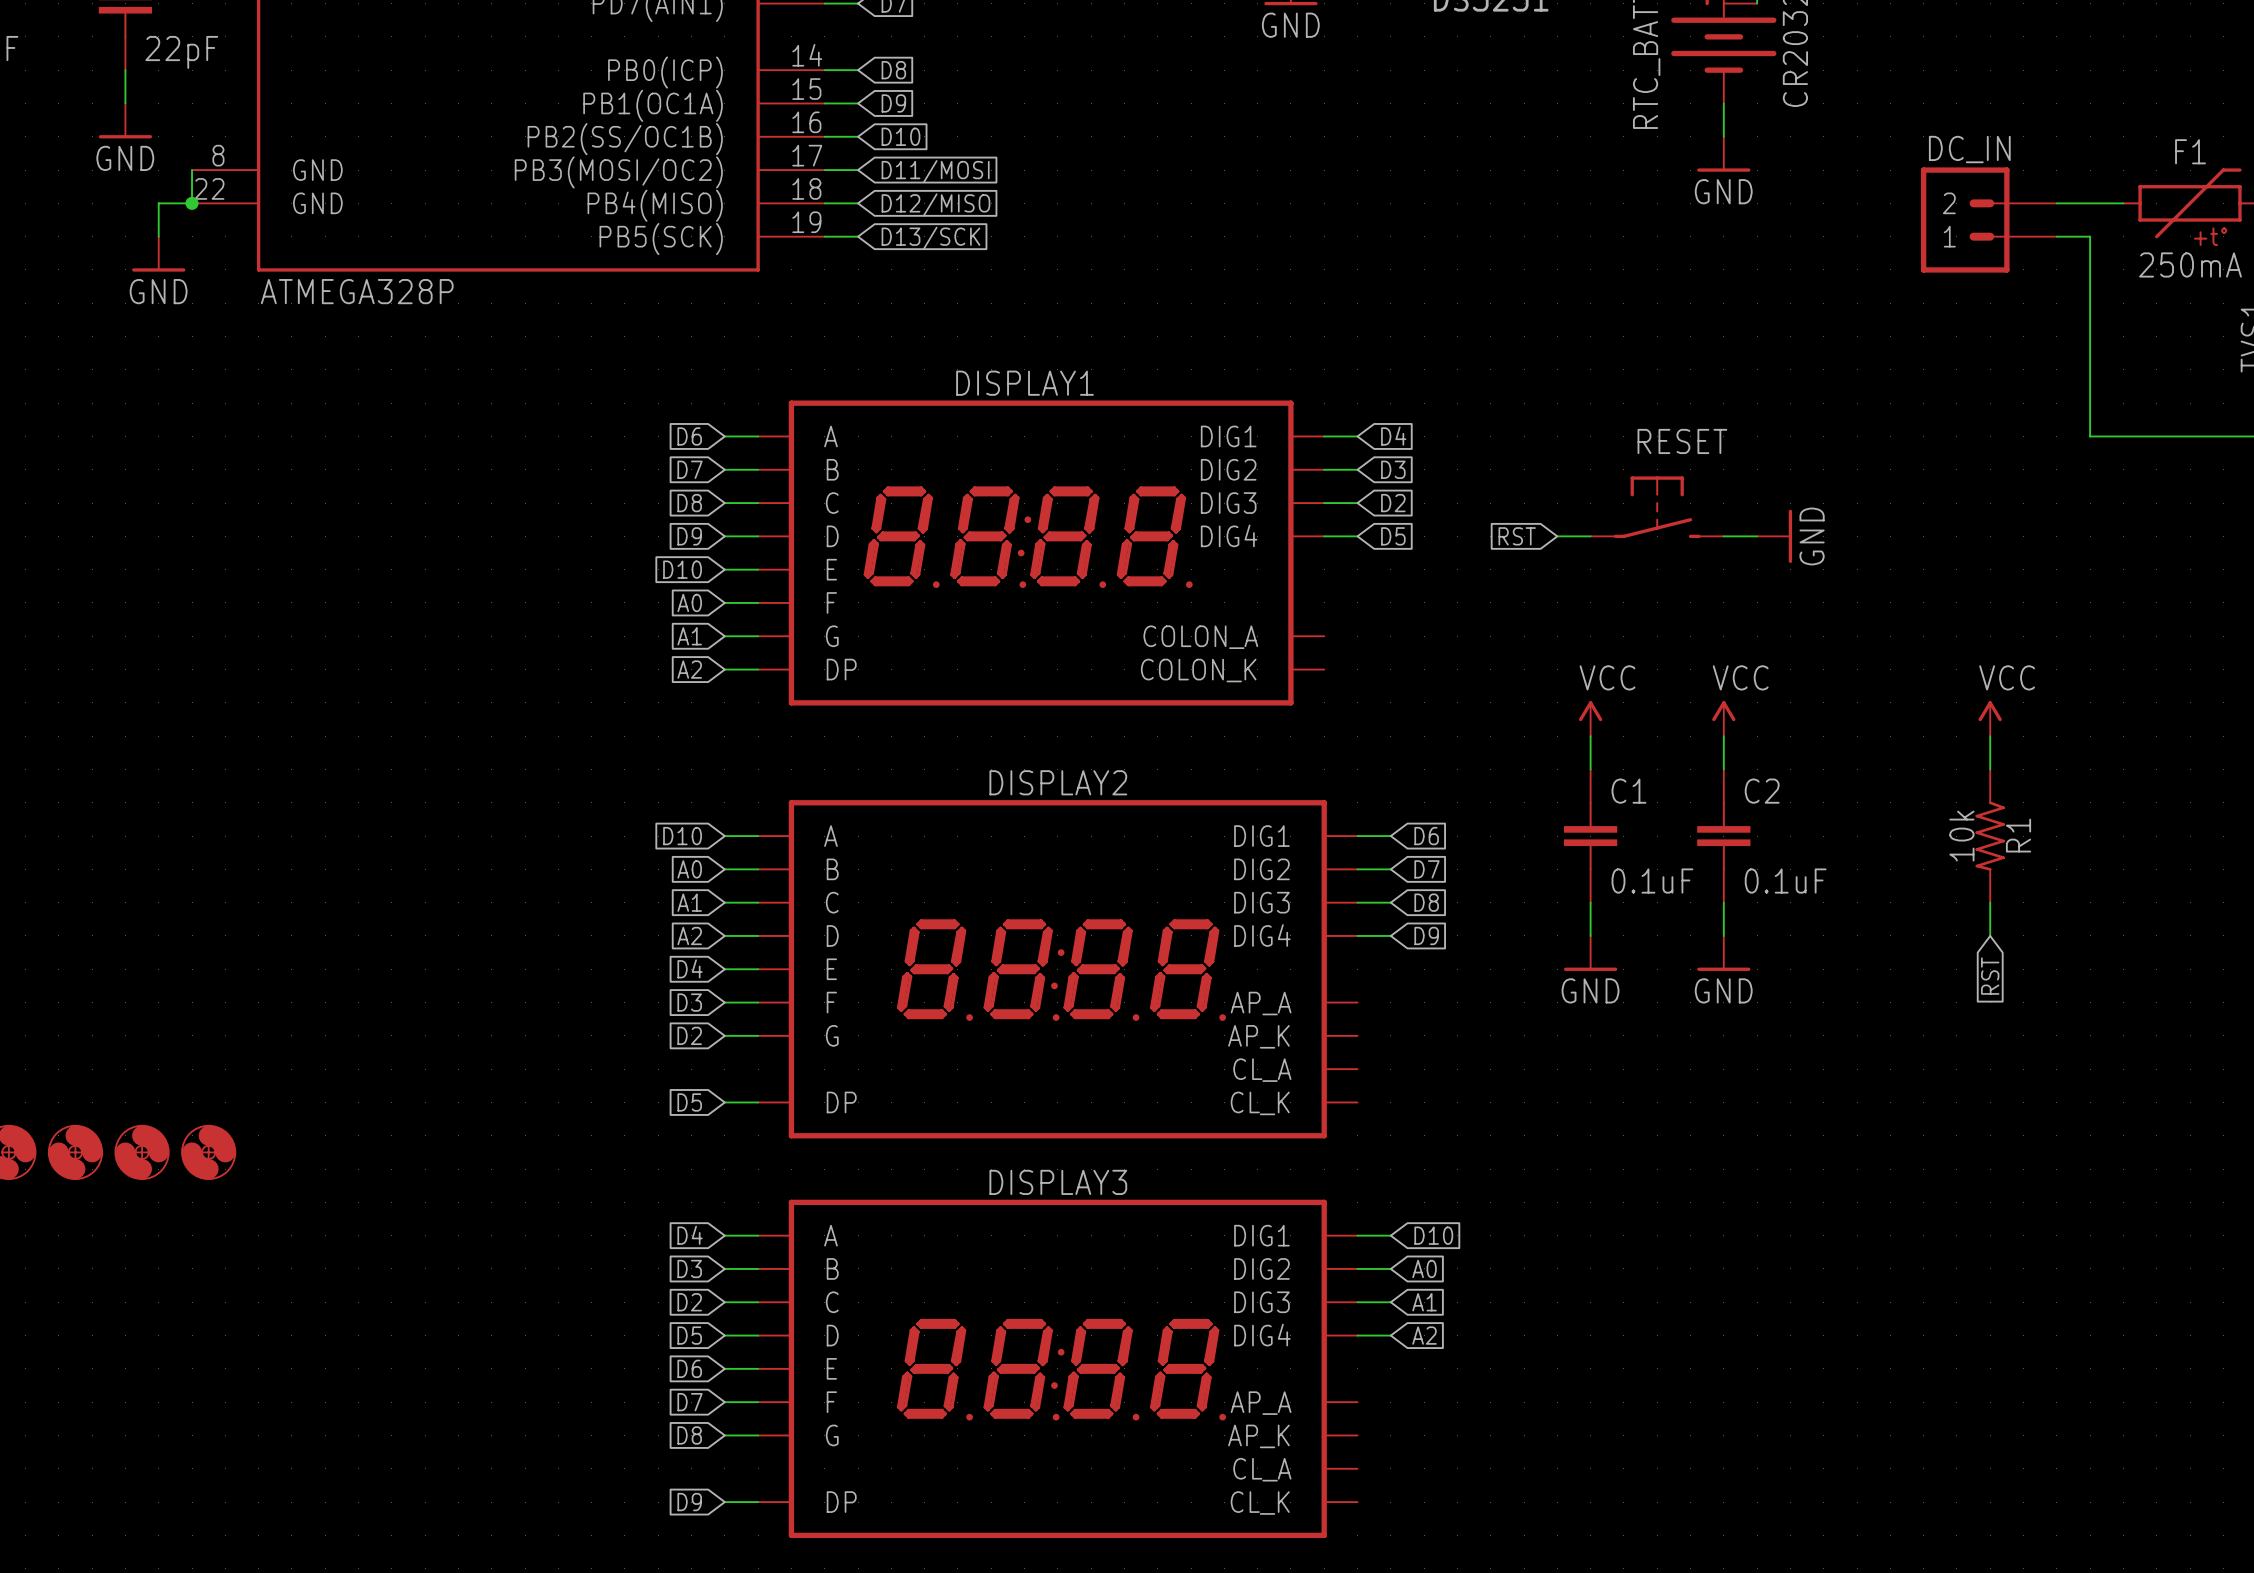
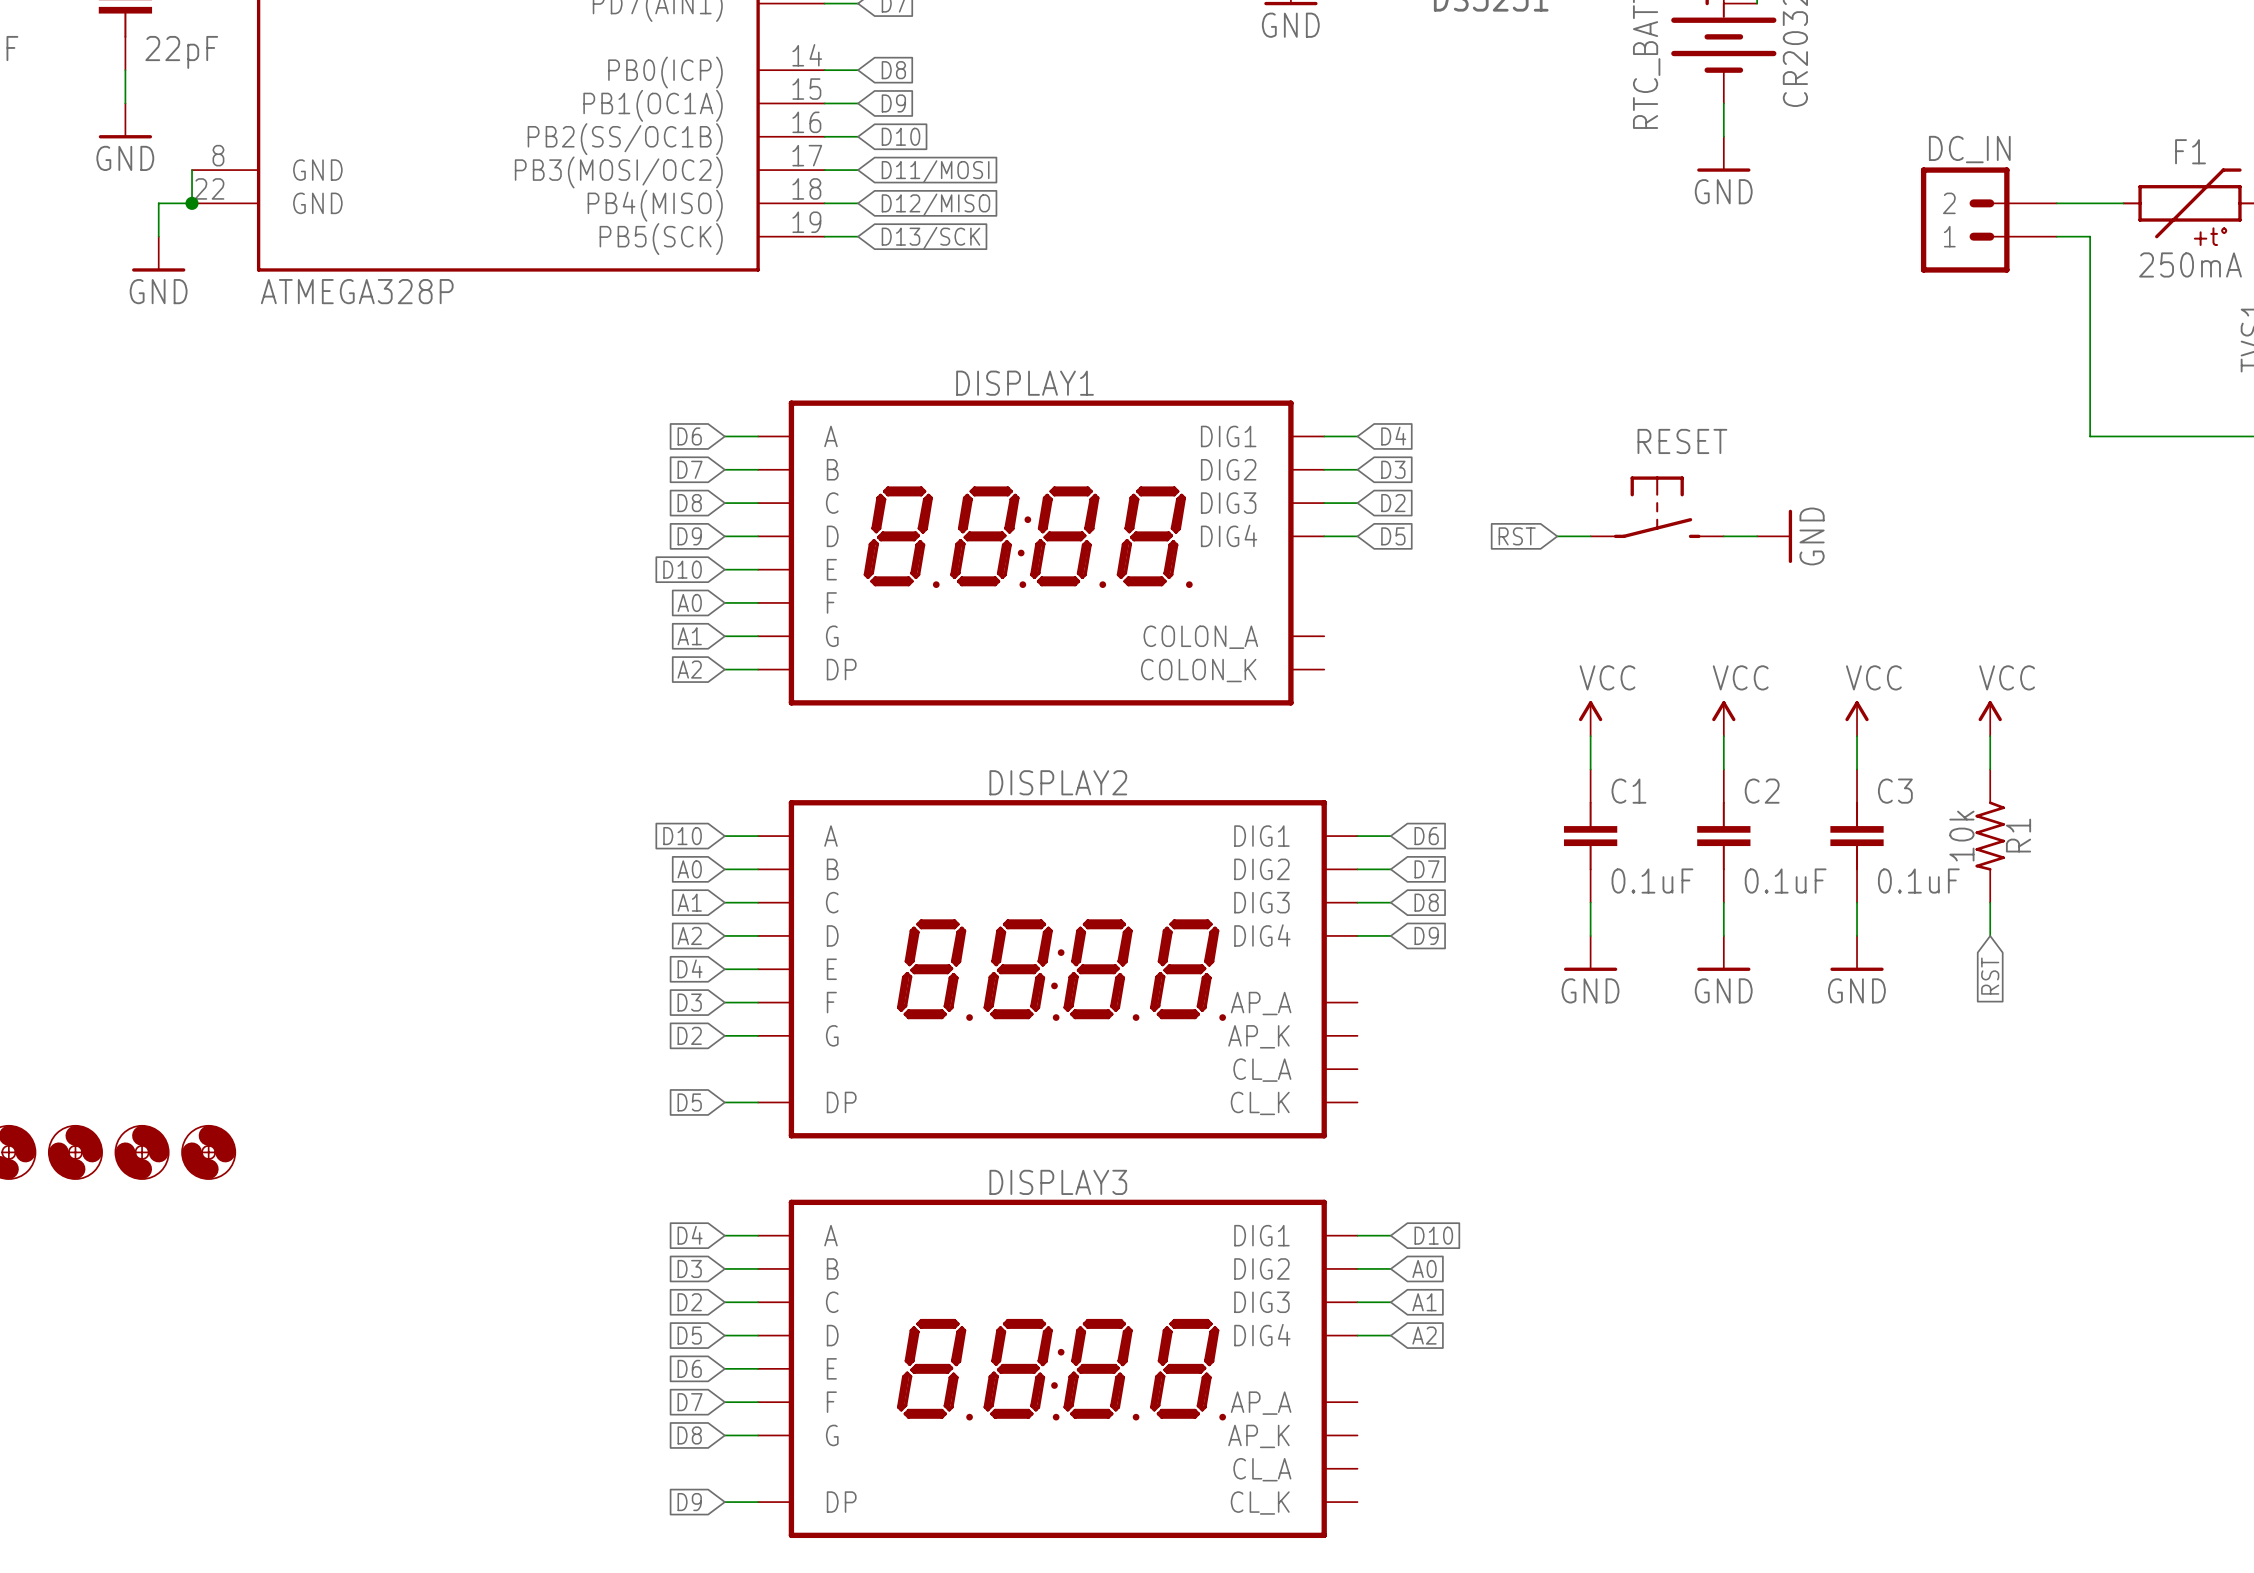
power symbol: none -> VCC (1857, 718)
wire: none -> (1857, 736) (1857, 769)
C3: none -> 0.1uF (1857, 836)
wire: none -> (1857, 902) (1857, 935)
power symbol: none -> GND (1857, 953)

